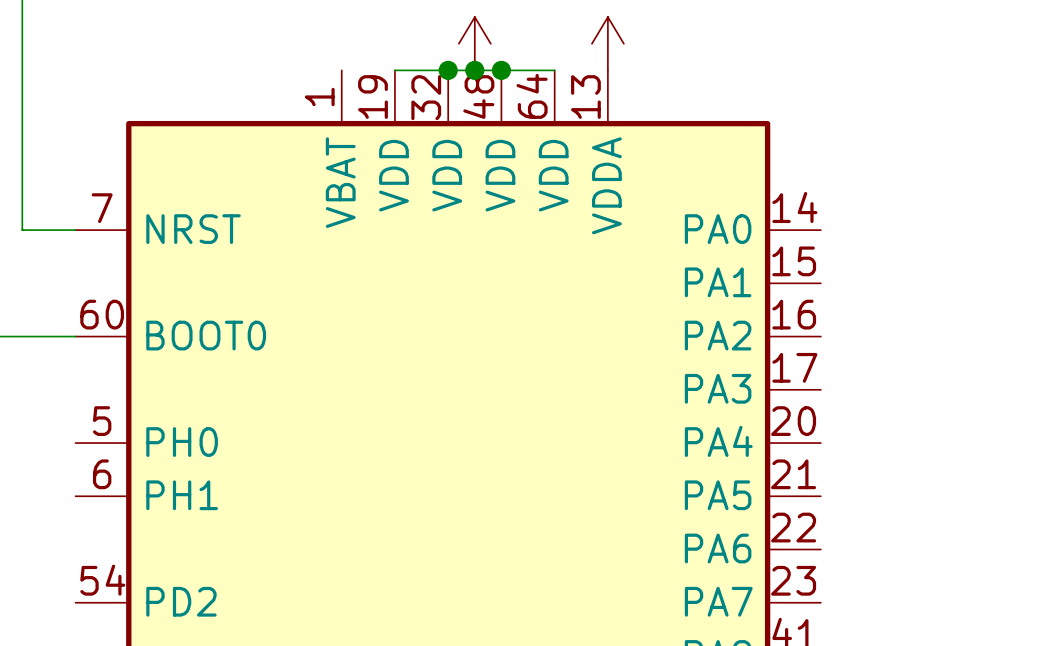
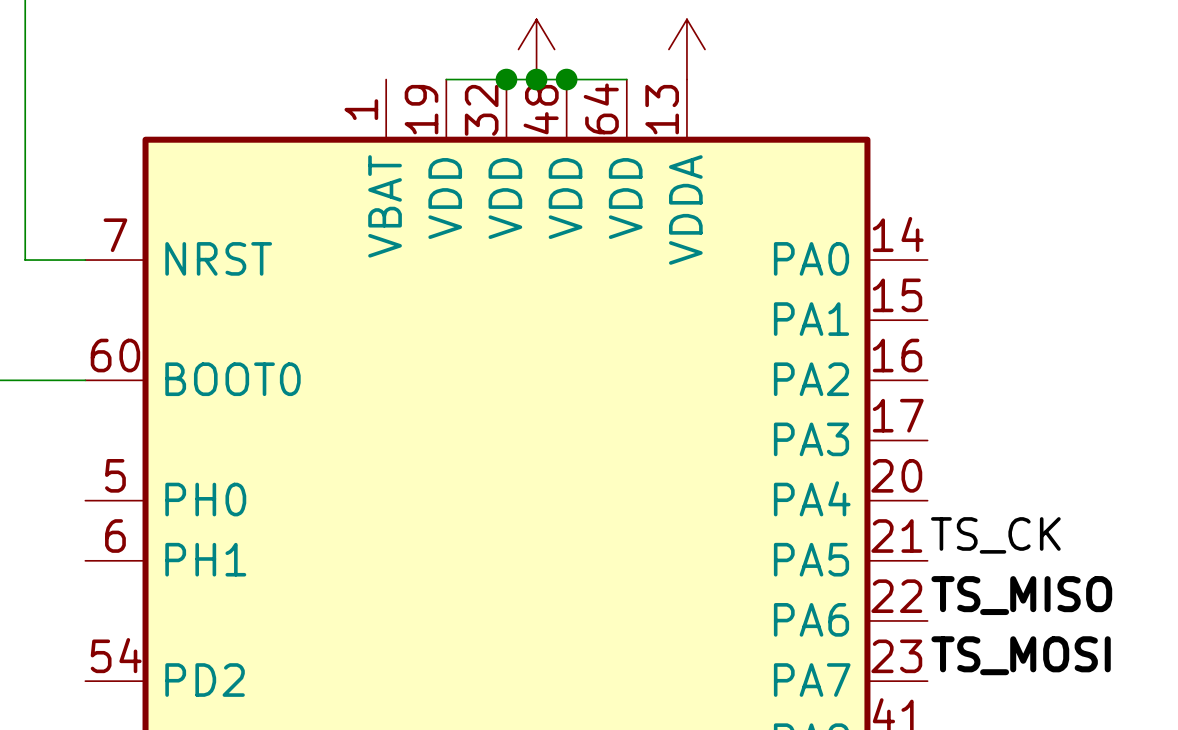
label: none -> TS_CK (995, 535)
label: none -> TS_MISO (1021, 595)
label: none -> TS_MOSI (1021, 655)

